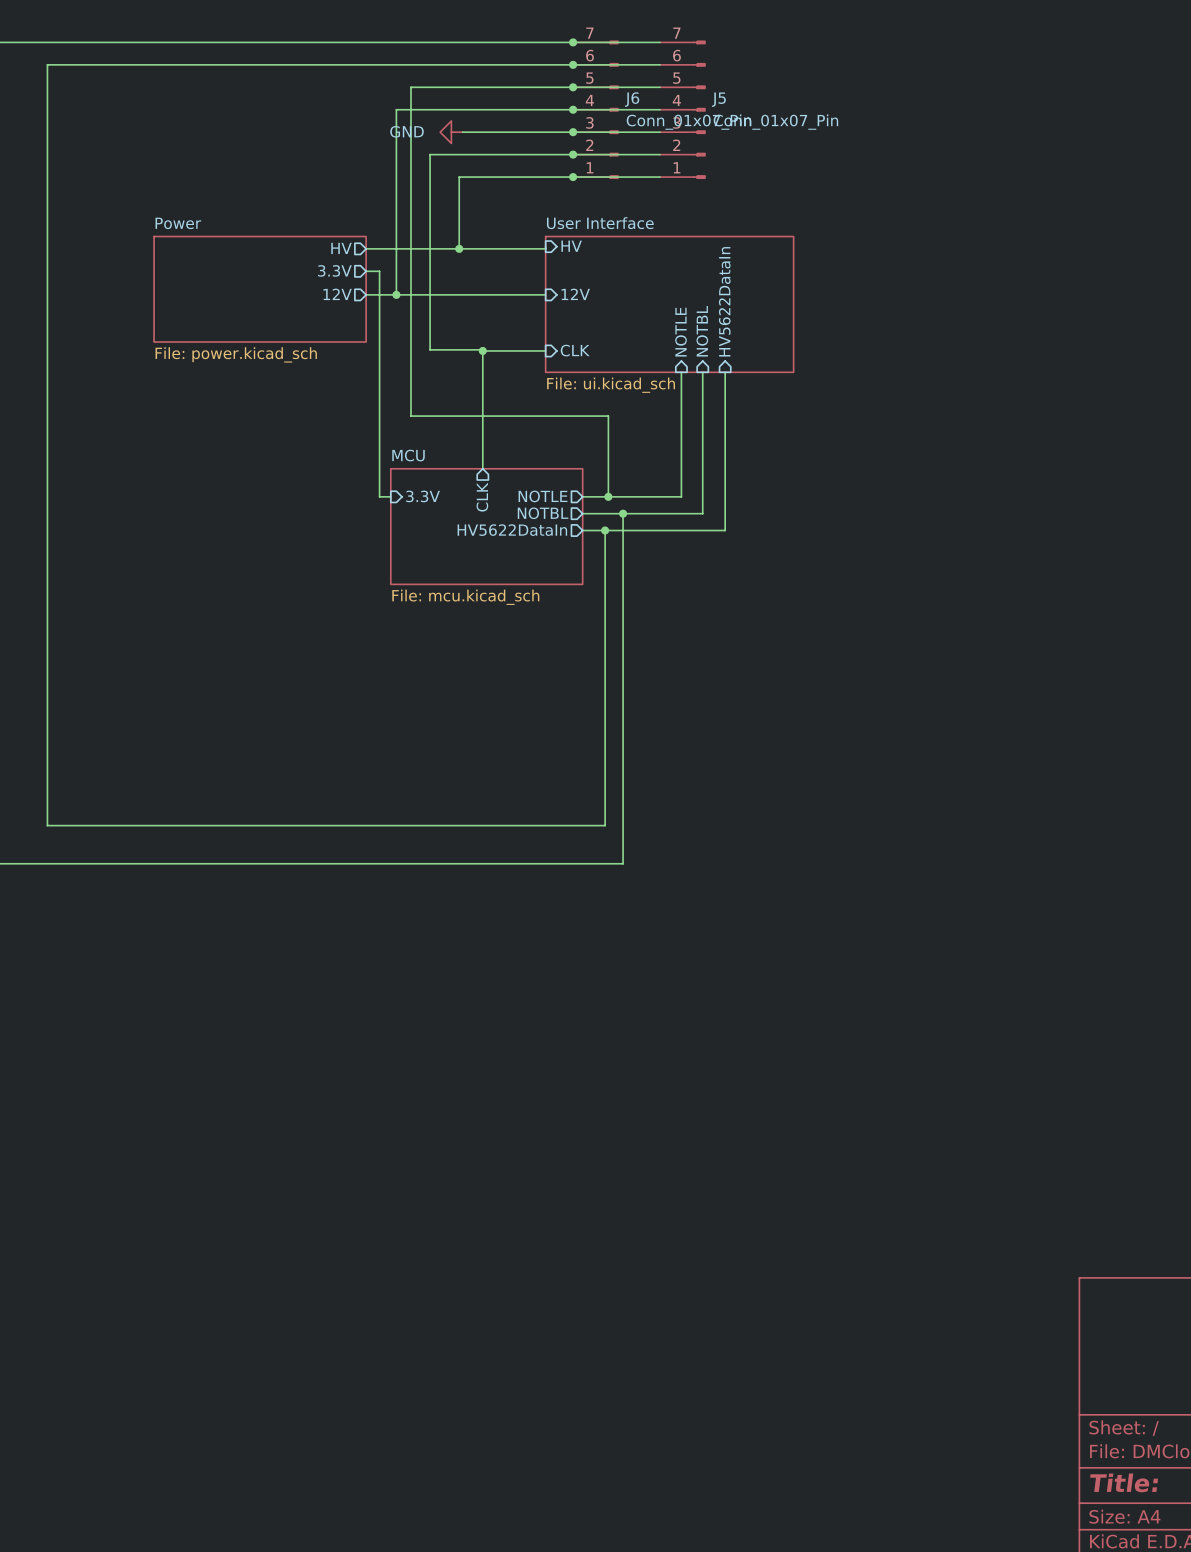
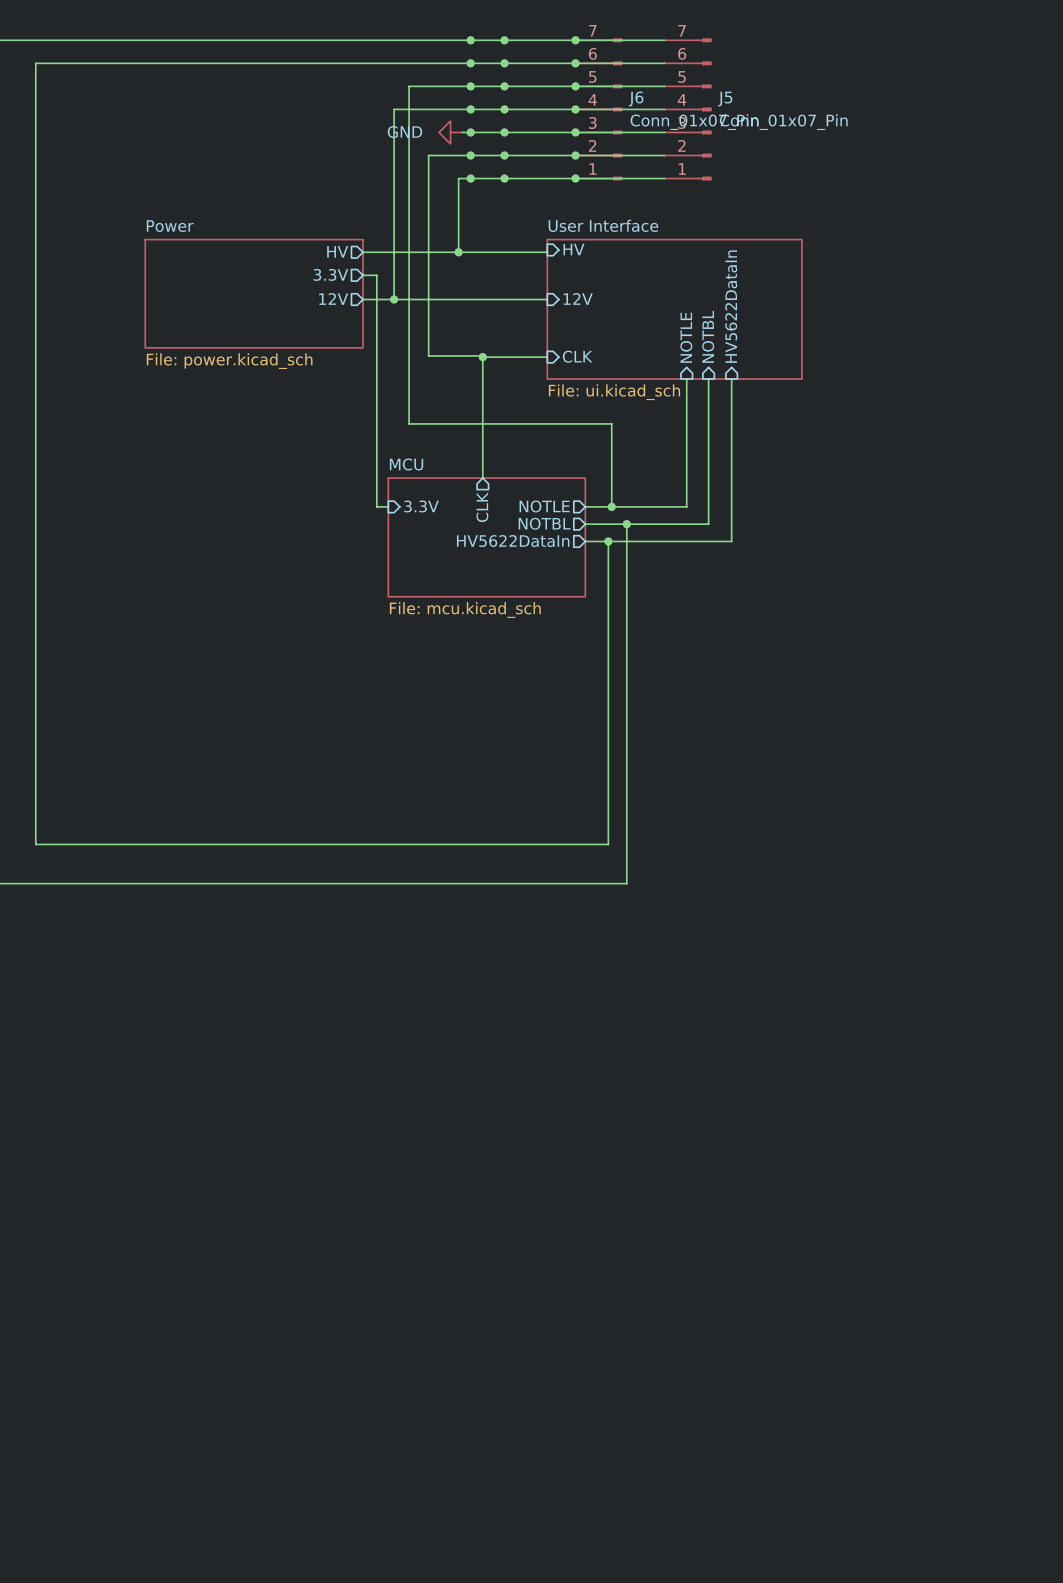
junction: none -> (470, 40)
junction: none -> (504, 40)
junction: none -> (470, 63)
junction: none -> (504, 63)
junction: none -> (470, 86)
junction: none -> (504, 86)
junction: none -> (470, 109)
junction: none -> (504, 109)
junction: none -> (470, 132)
junction: none -> (504, 132)
junction: none -> (470, 155)
junction: none -> (504, 155)
junction: none -> (470, 178)
junction: none -> (504, 178)

